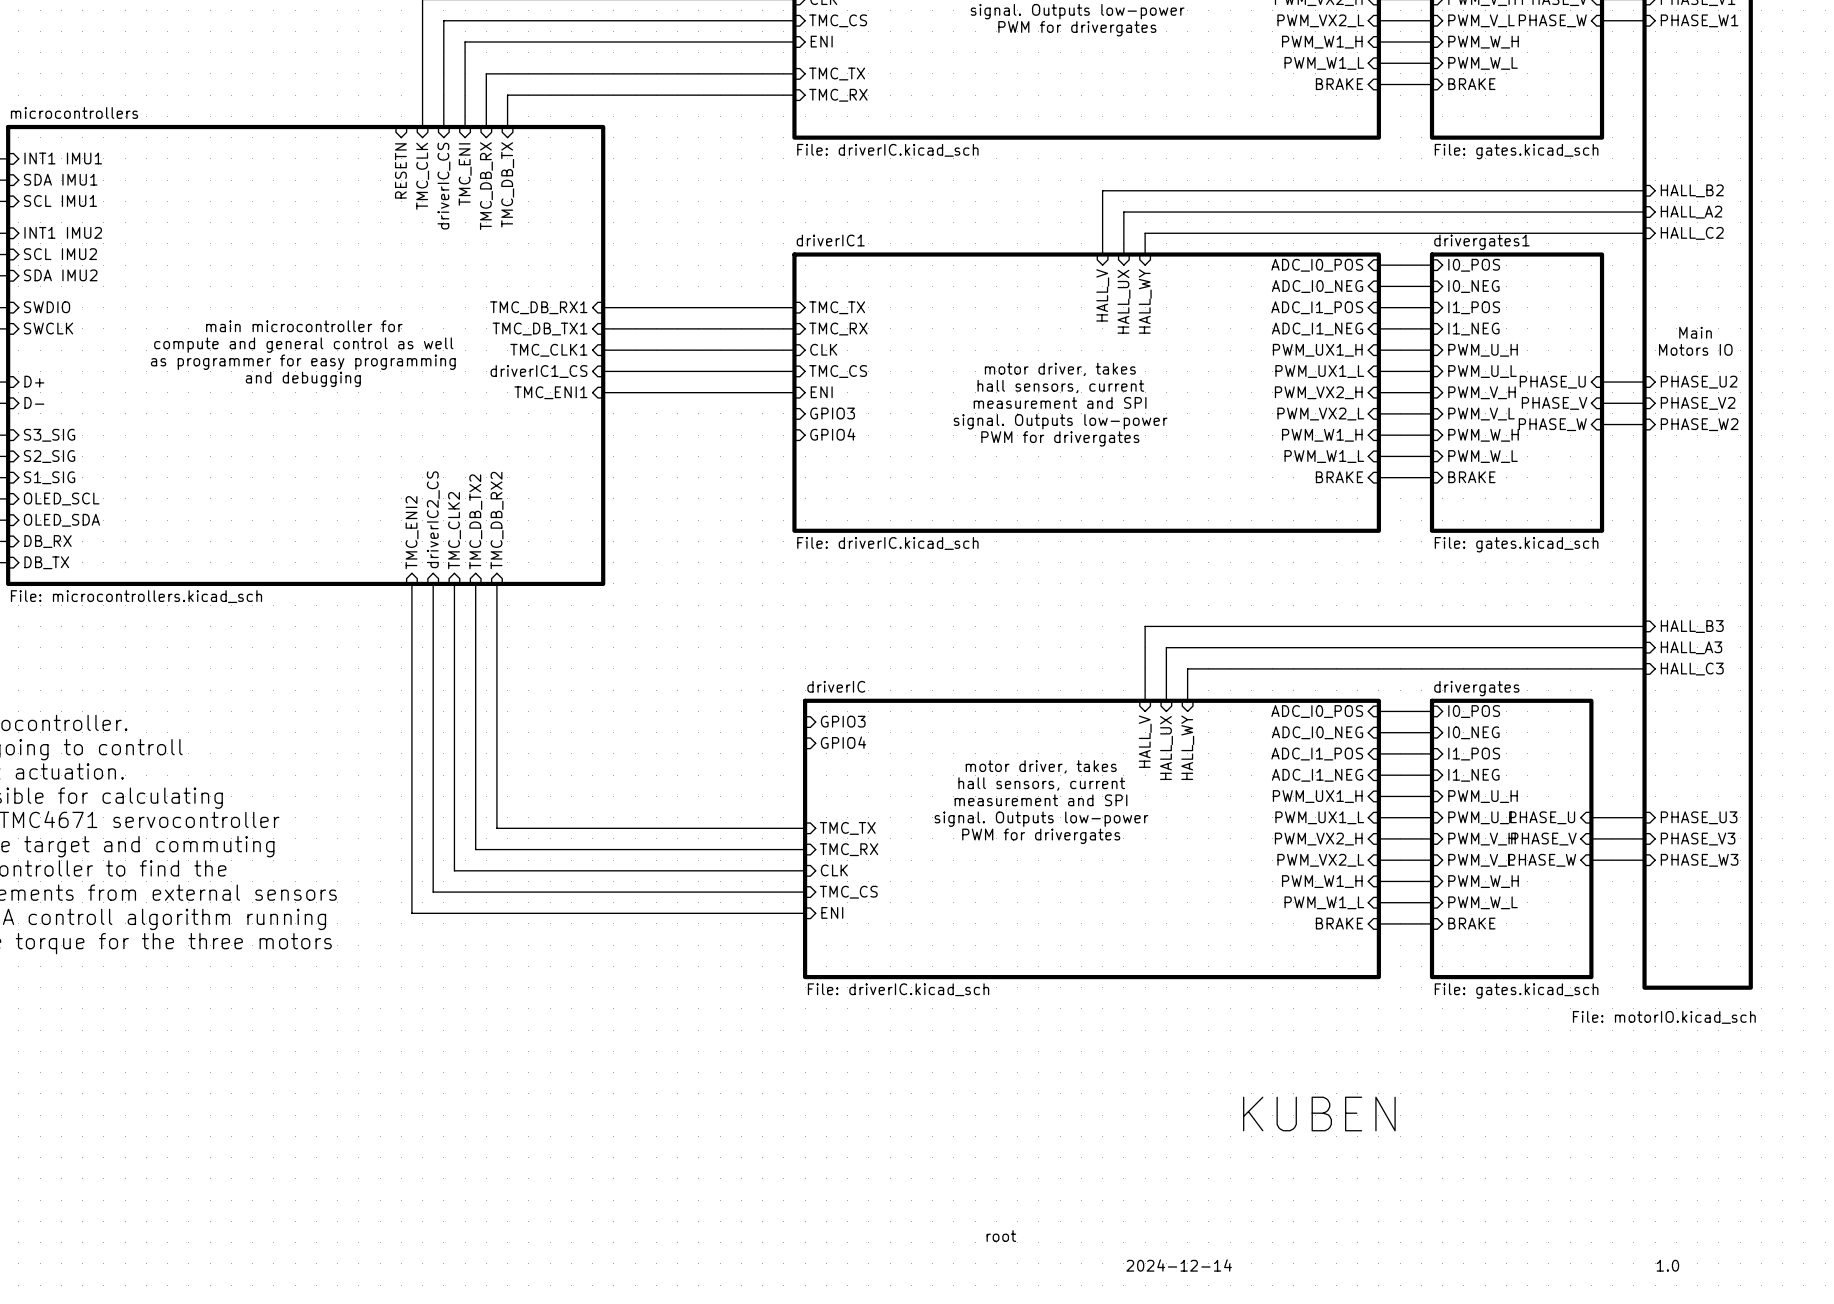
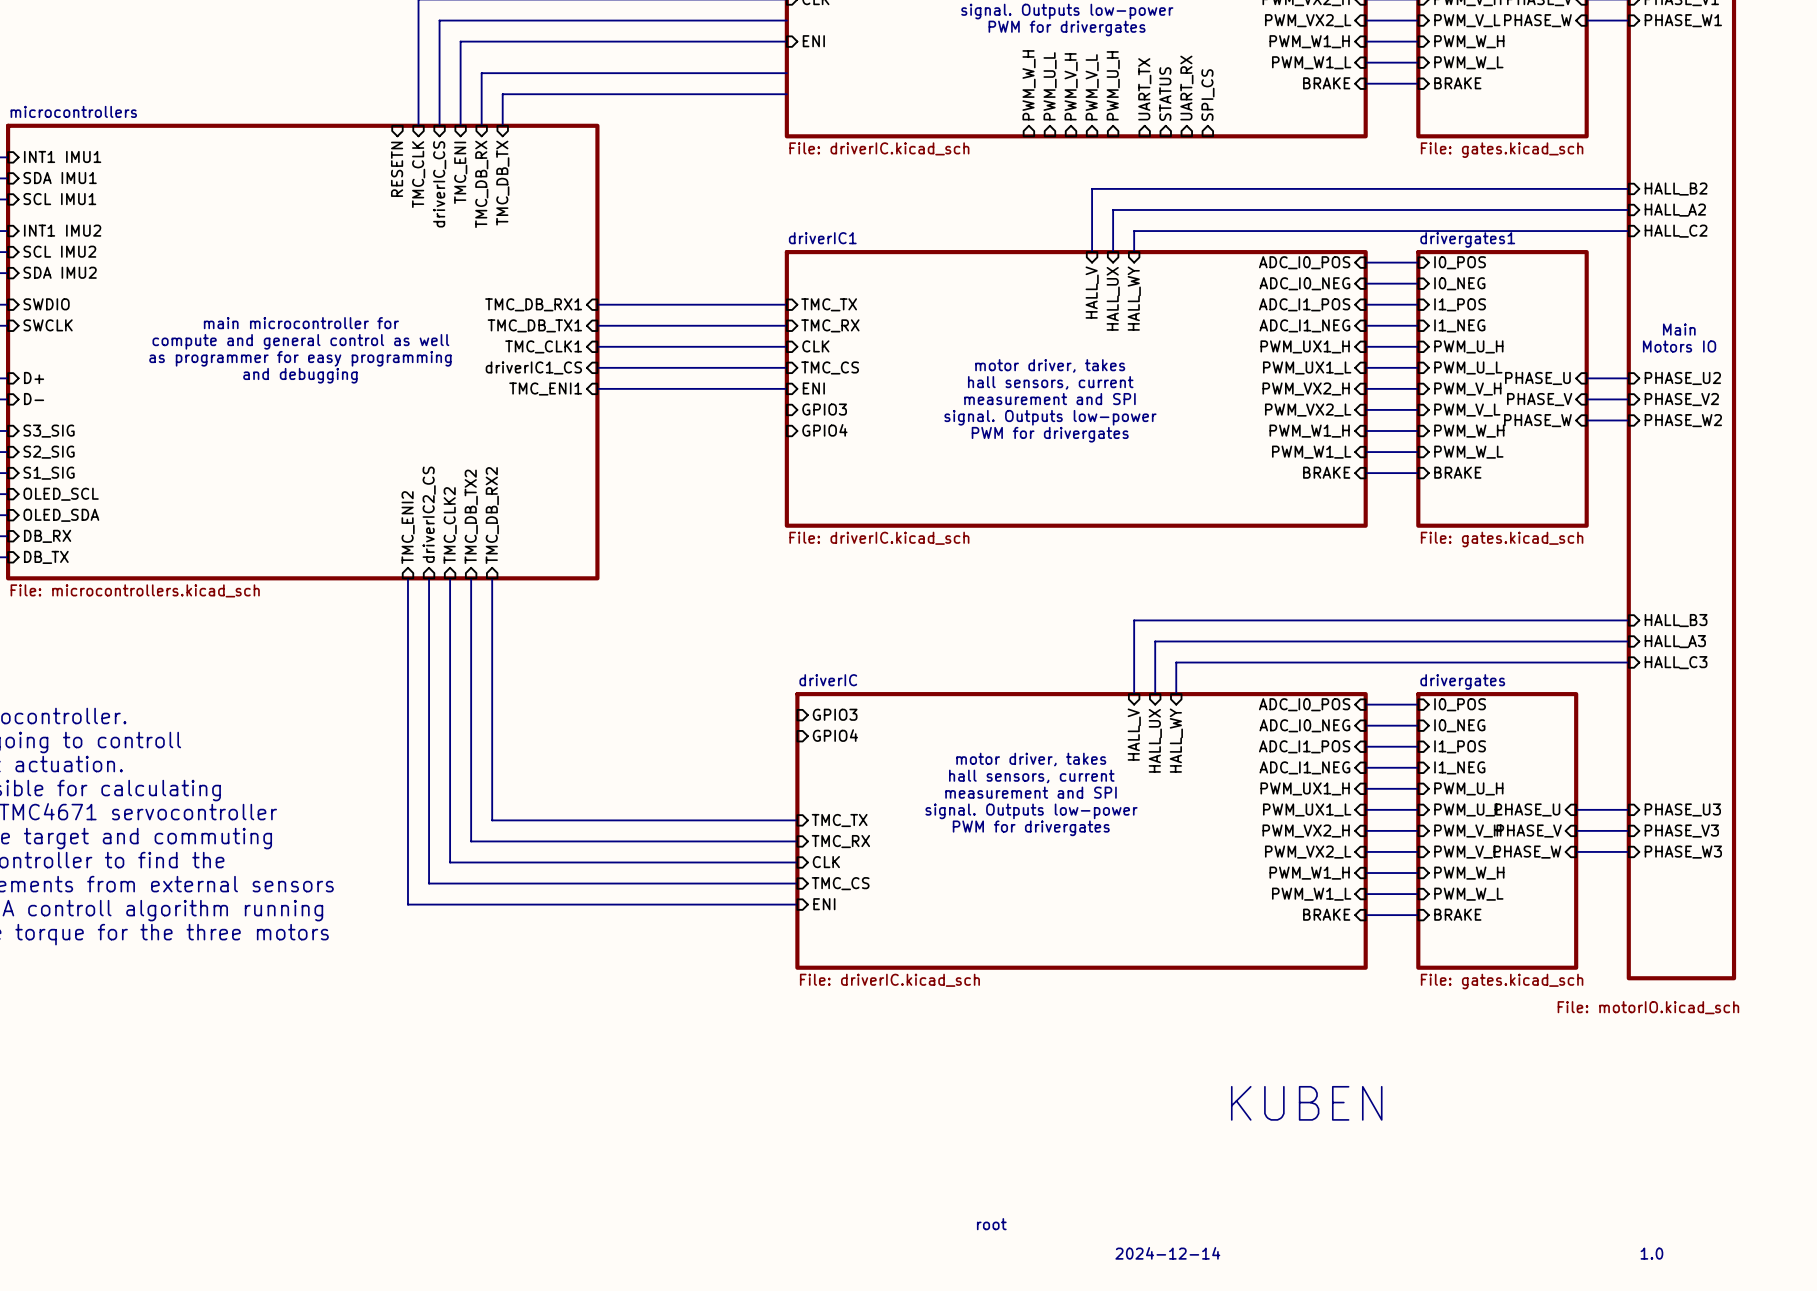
sheet pin: TMC_CS (838, 20) -> none
sheet pin: TMC_TX (837, 73) -> none
sheet pin: none -> PWM_W_H (1029, 85)
sheet pin: none -> PWM_U_H (1113, 85)
sheet pin: none -> PWM_U_L (1050, 86)
sheet pin: none -> PWM_V_H (1071, 86)
sheet pin: none -> PWM_V_L (1092, 87)
sheet pin: none -> UART_RX (1186, 88)
sheet pin: none -> UART_TX (1144, 89)
sheet pin: none -> STATUS (1165, 94)
sheet pin: TMC_RX (838, 95) -> none
sheet pin: none -> SPI_CS (1207, 95)

